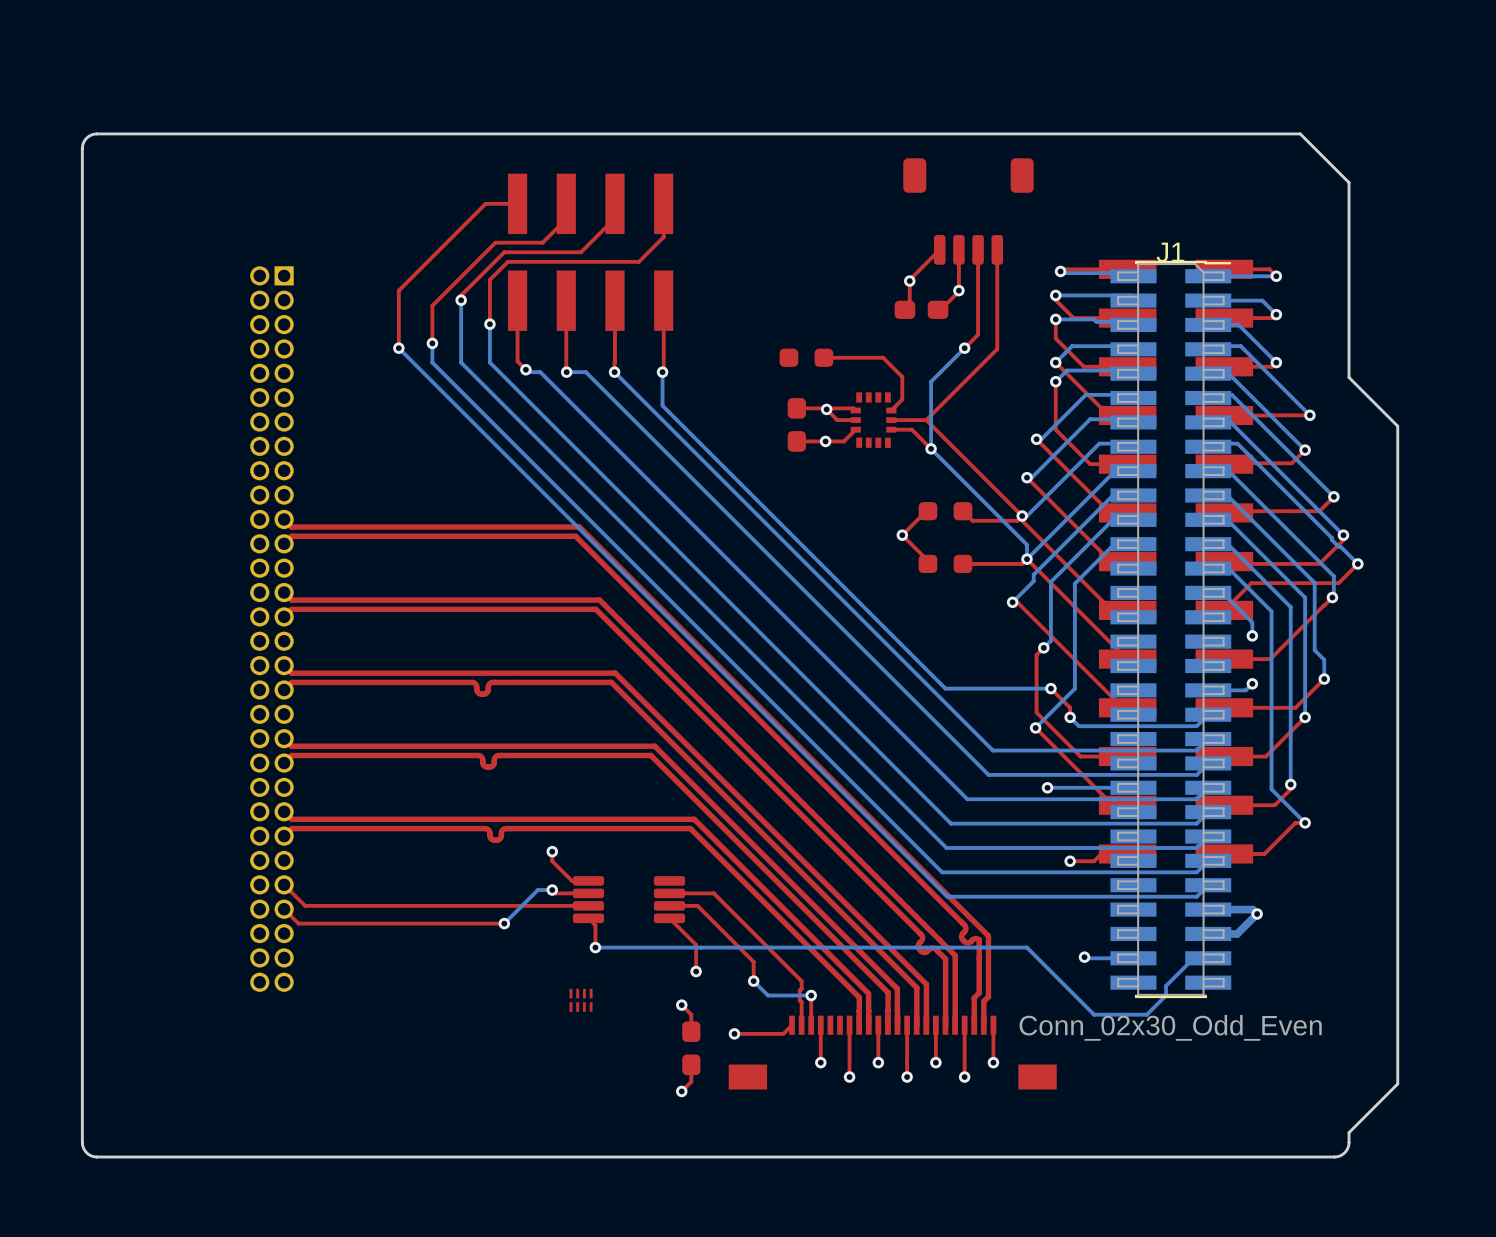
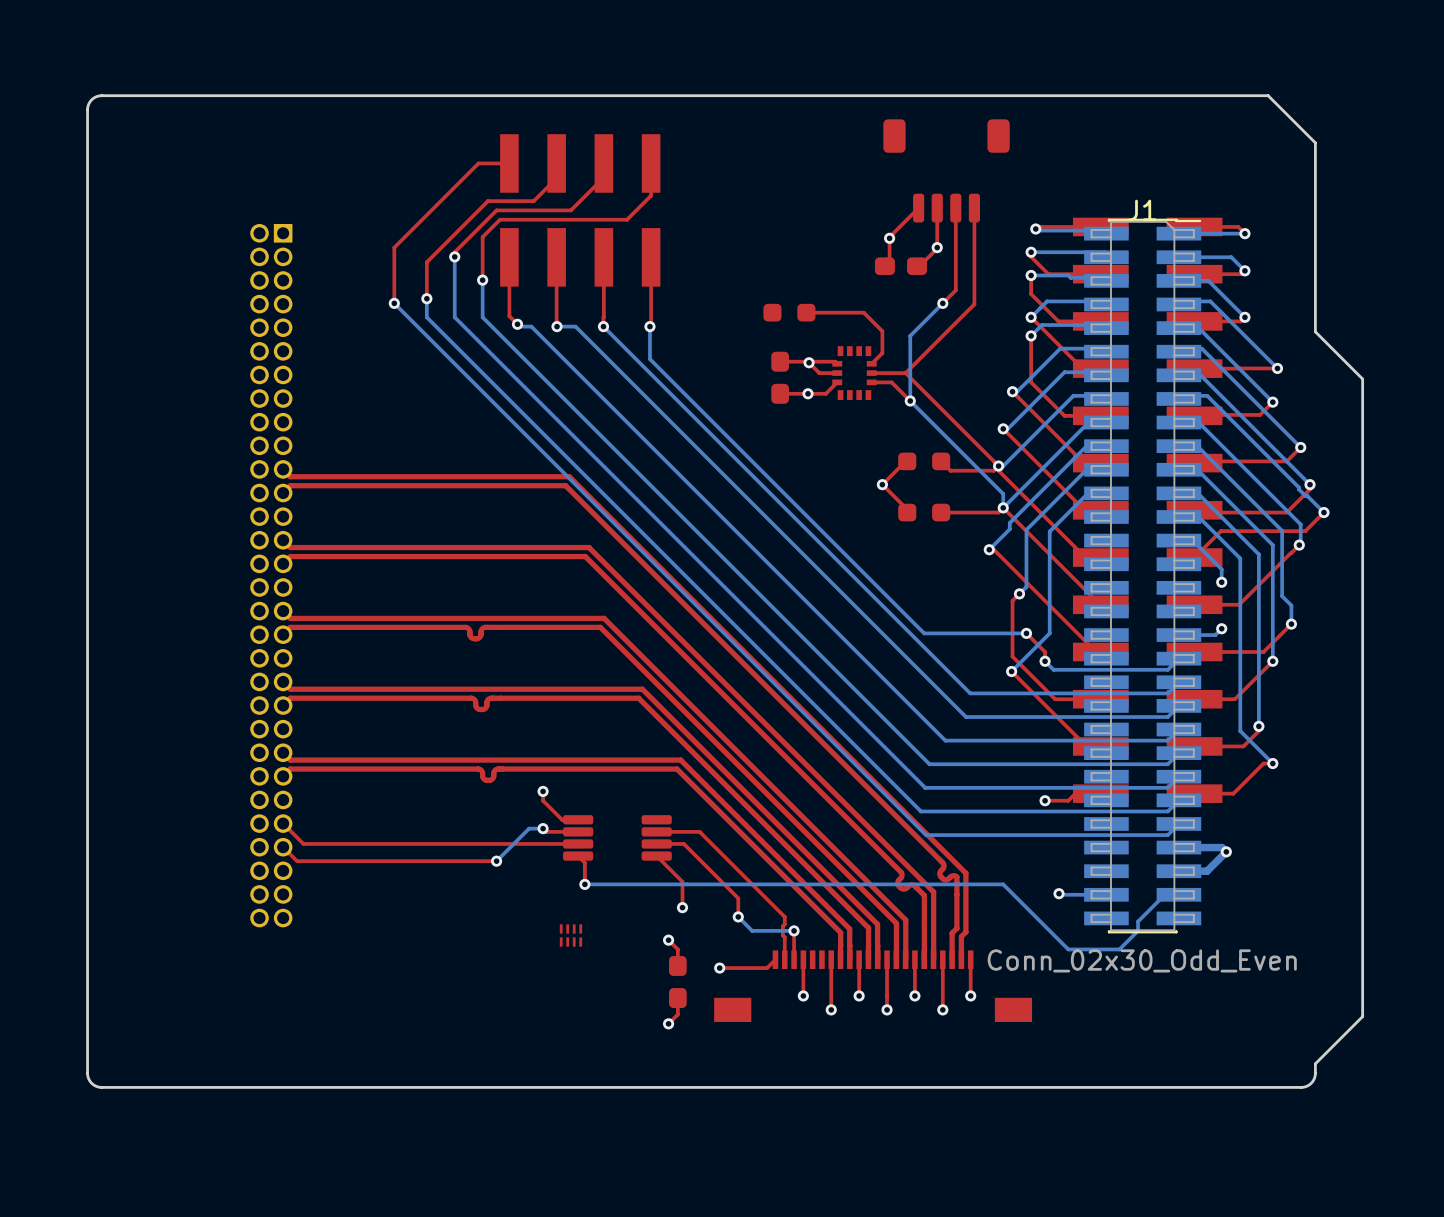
via: (1047, 787) -> none
bottom track: (1133, 787) (1047, 787) -> none

